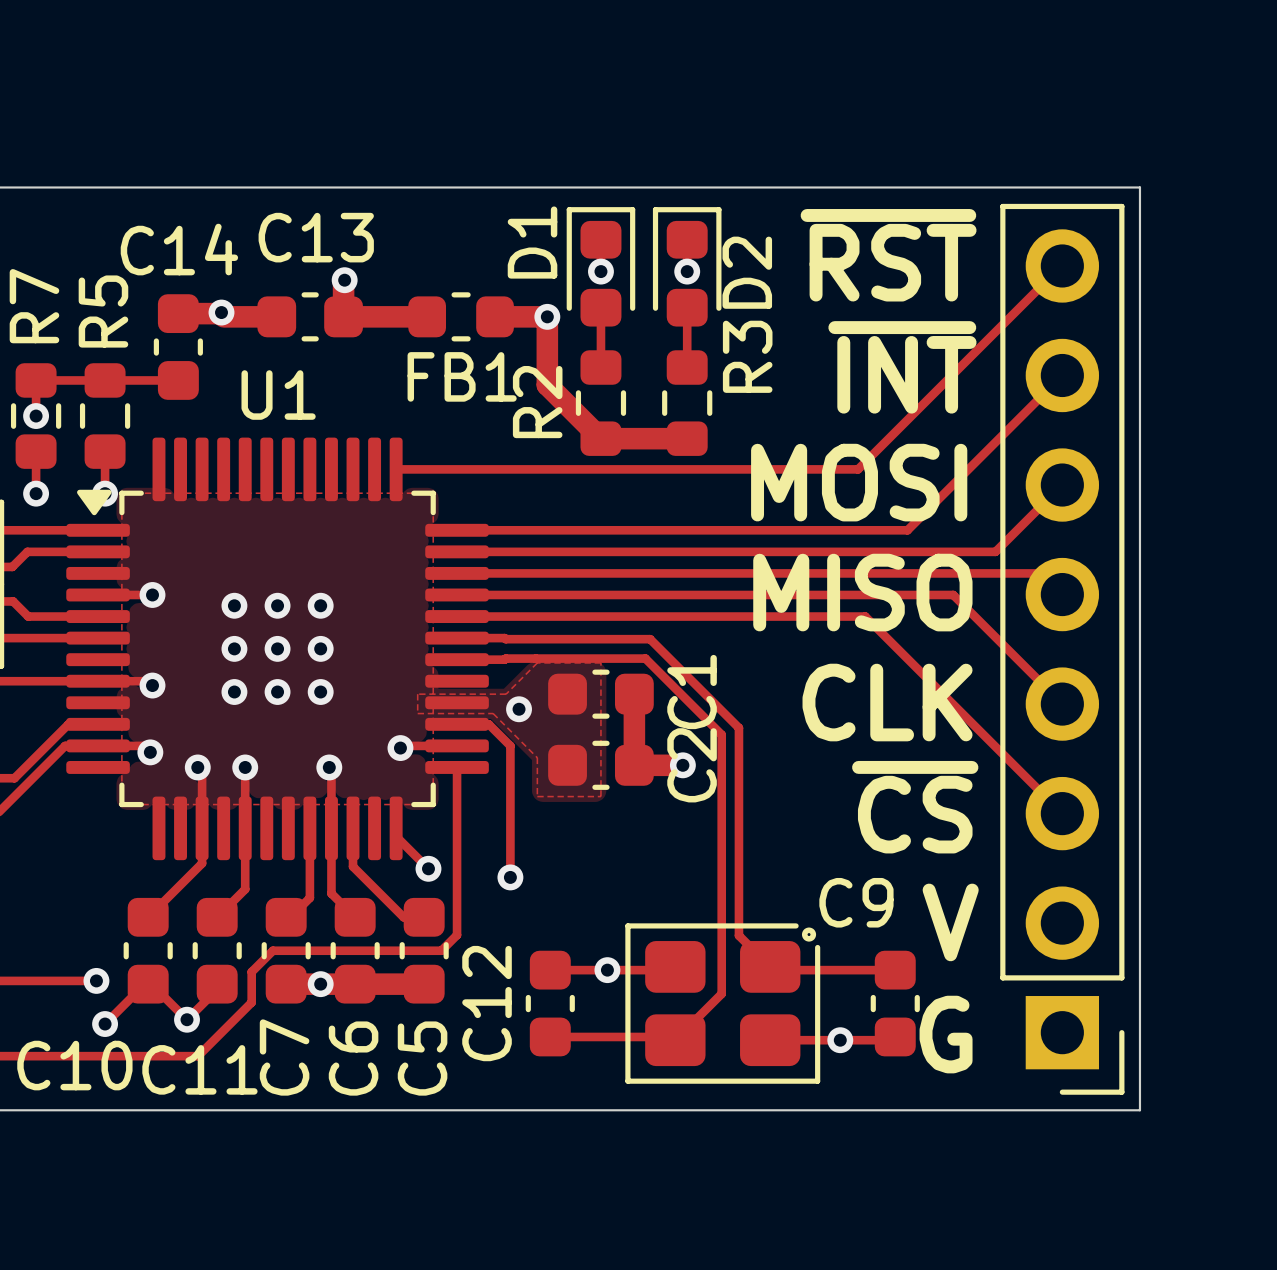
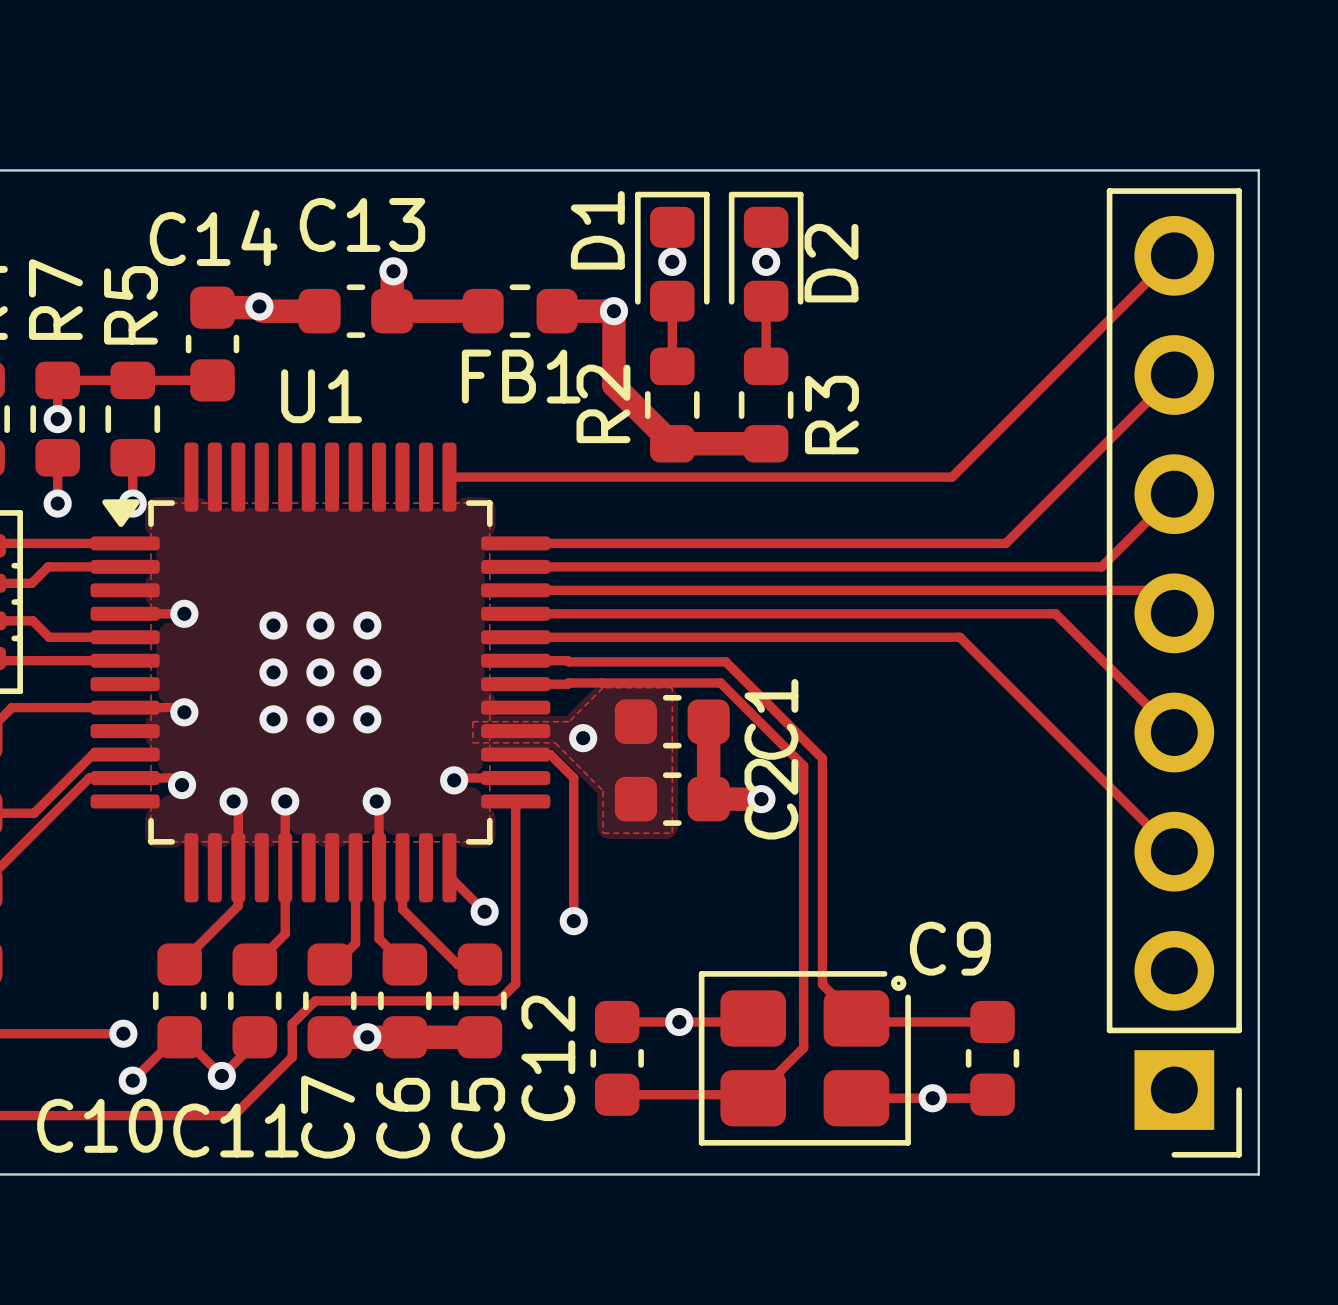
text: ~{RST} (888, 255) -> none
R3 name position: R3 (747, 356) -> R3 (831, 415)
text: ~{INT} (902, 367) -> none
text: MOSI (859, 482) -> none
text: MISO (862, 592) -> none
text: CLK (887, 702) -> none
text: ~{CS} (915, 807) -> none
text: V (950, 922) -> none
text: G (946, 1034) -> none

